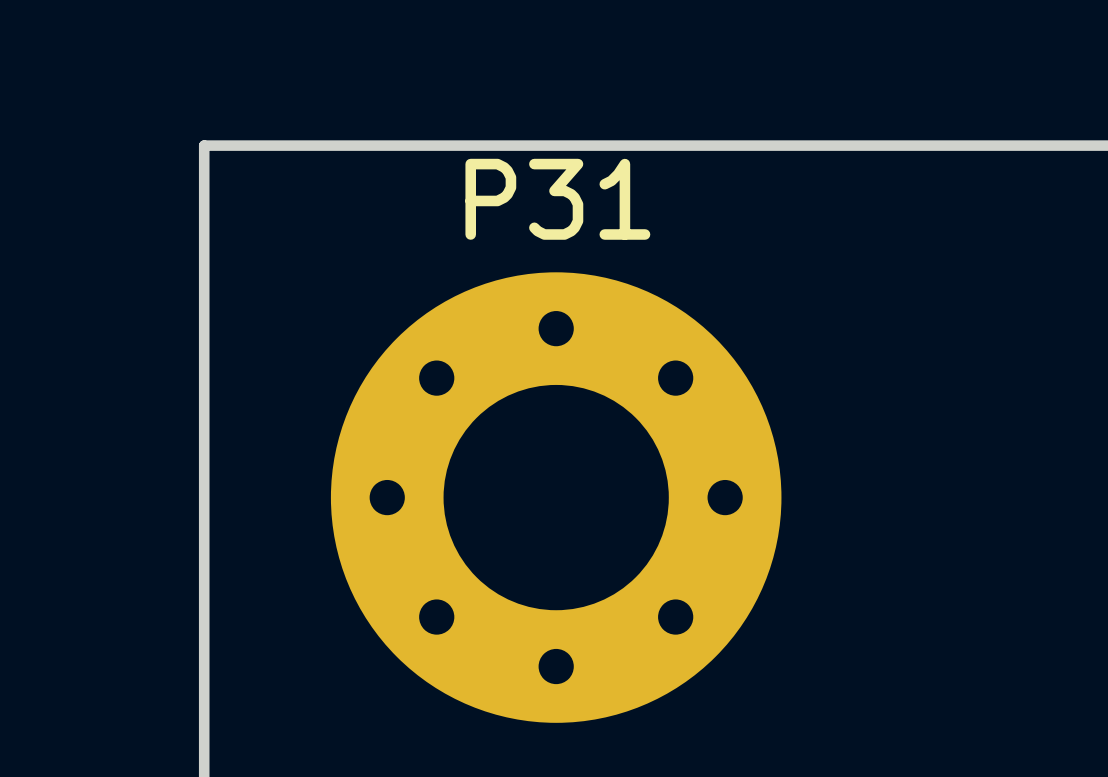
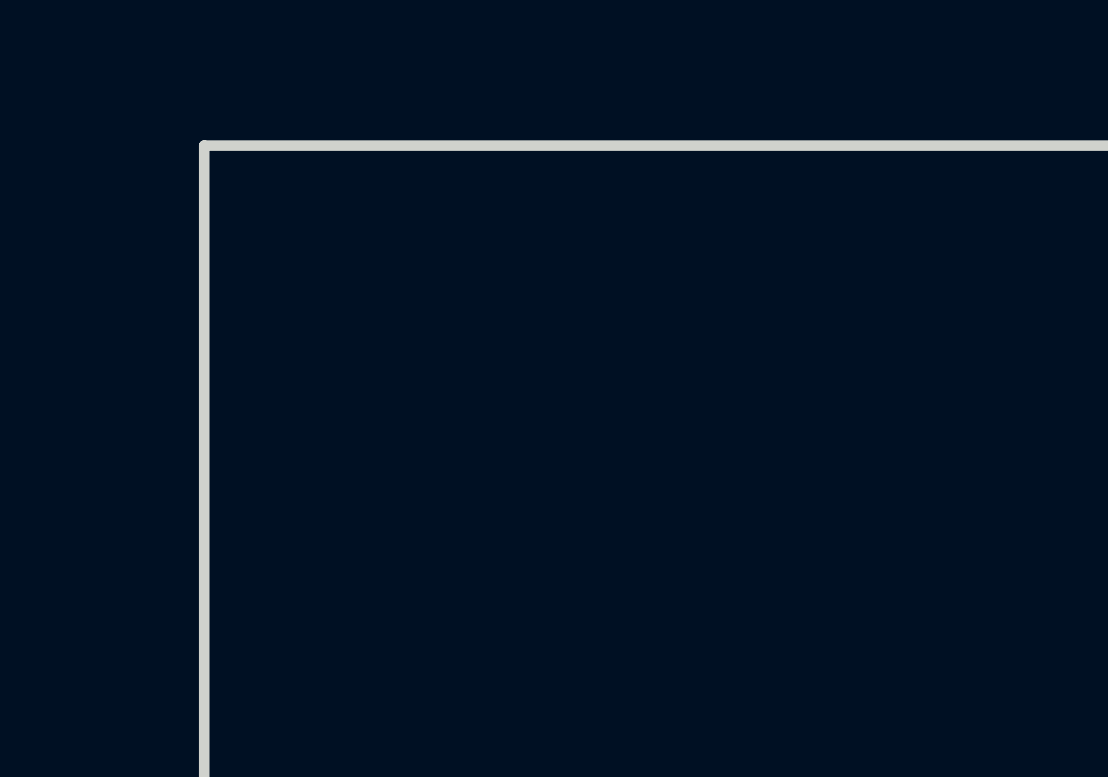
P31: (556, 497) -> none

